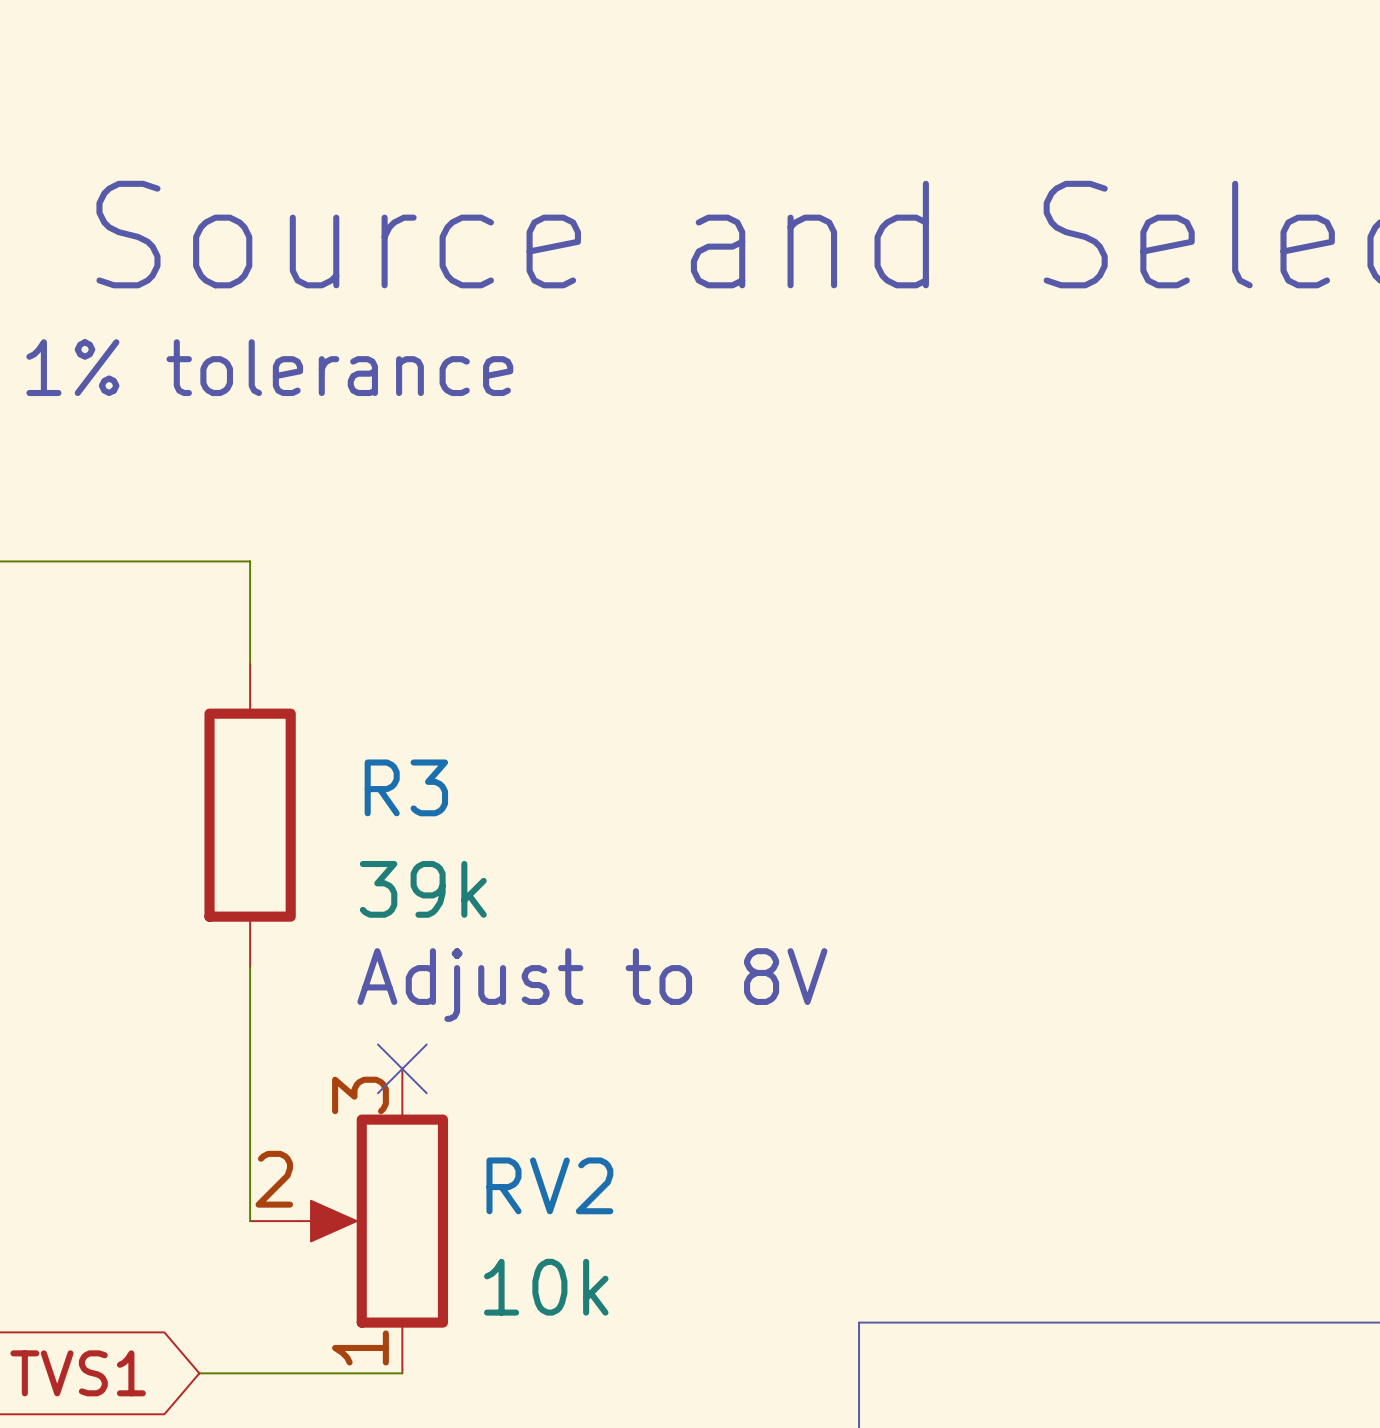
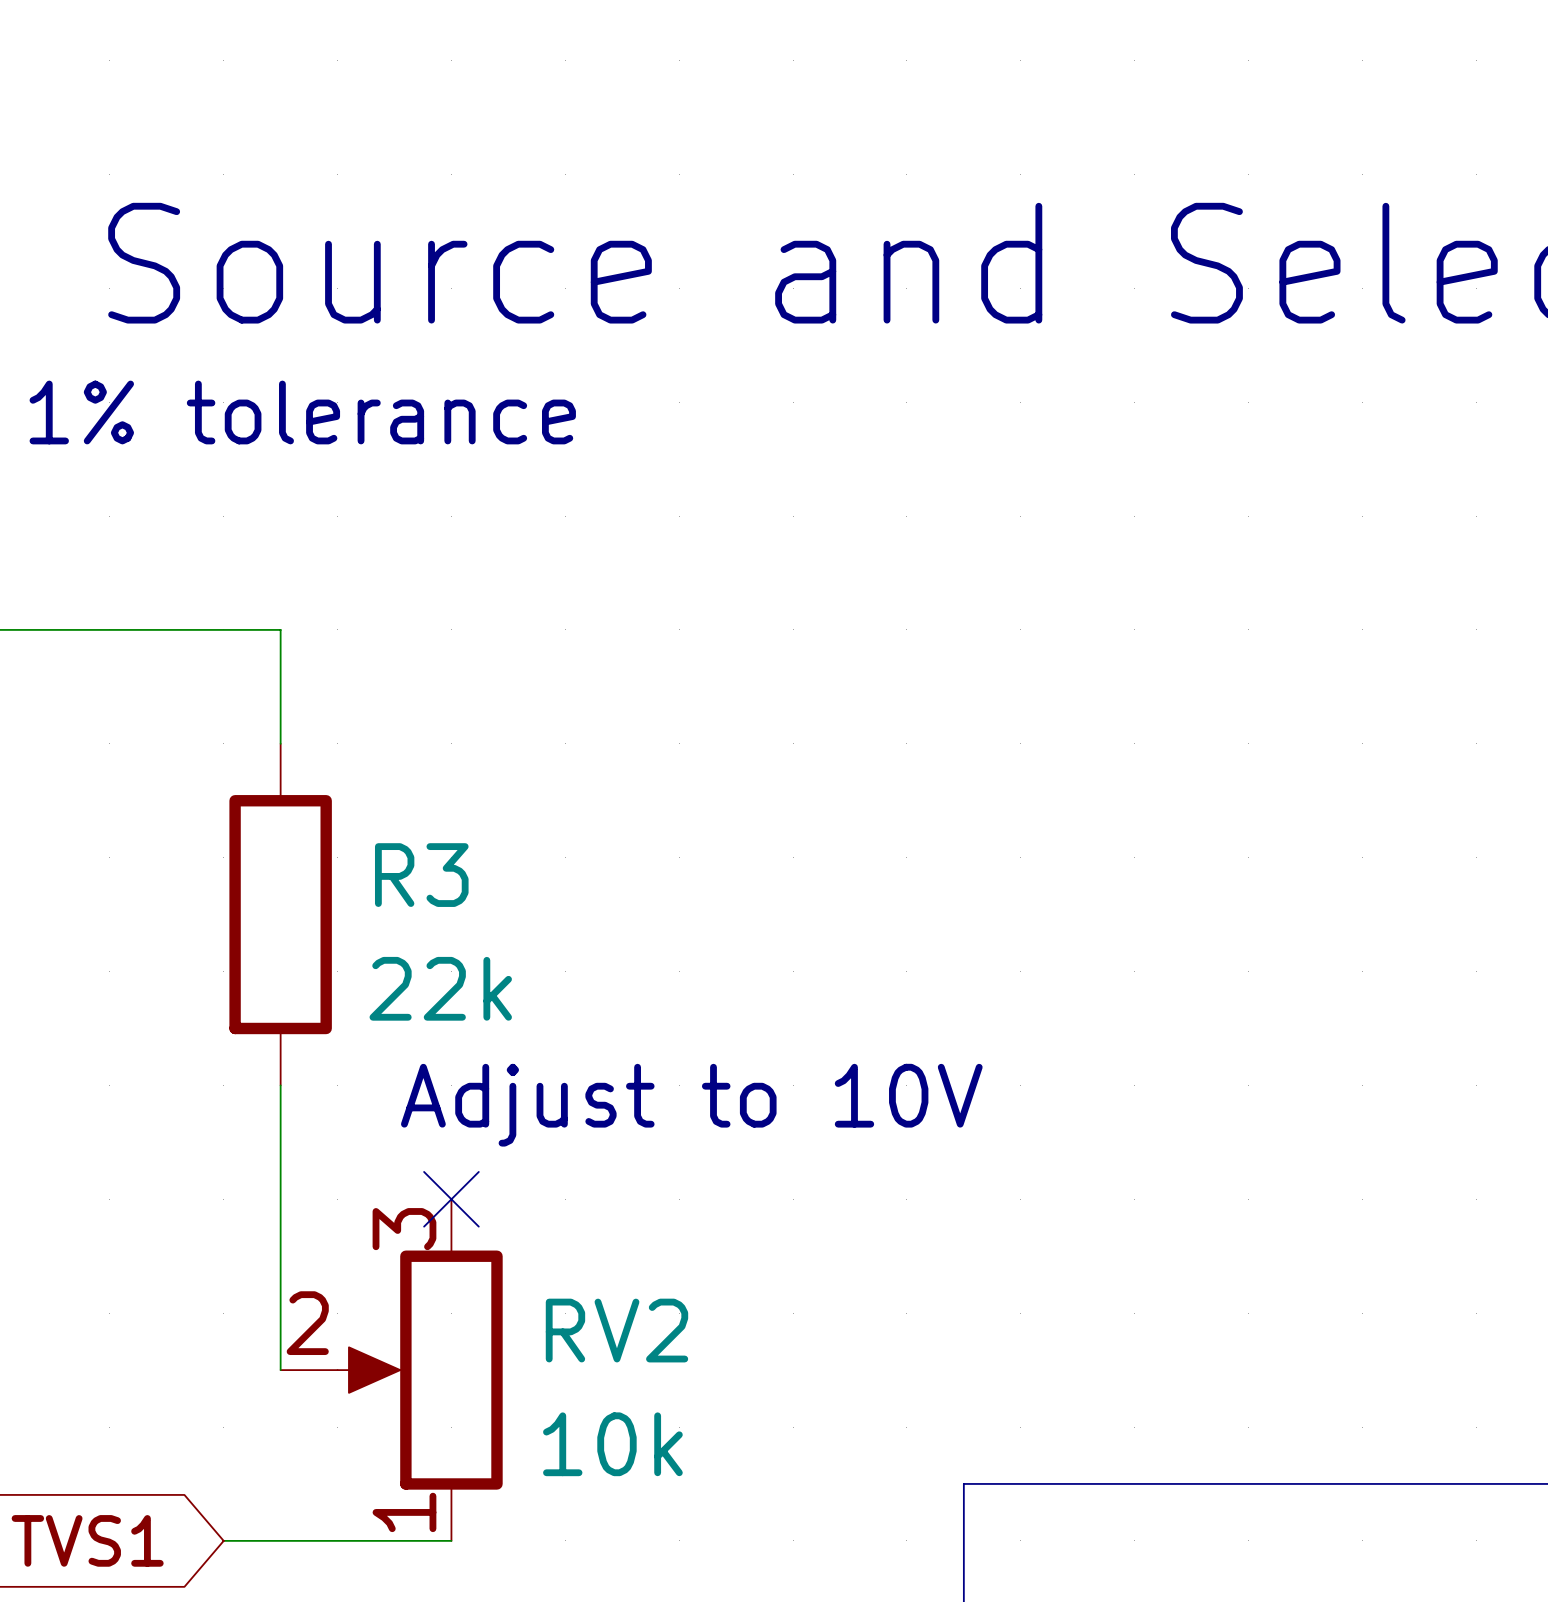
R3 name position: R3 (406, 787) -> R3 (421, 875)
R3 value: 39k (423, 889) -> 22k (440, 988)
text: Adjust to 8V (592, 985) -> Adjust to 10V (691, 1105)

